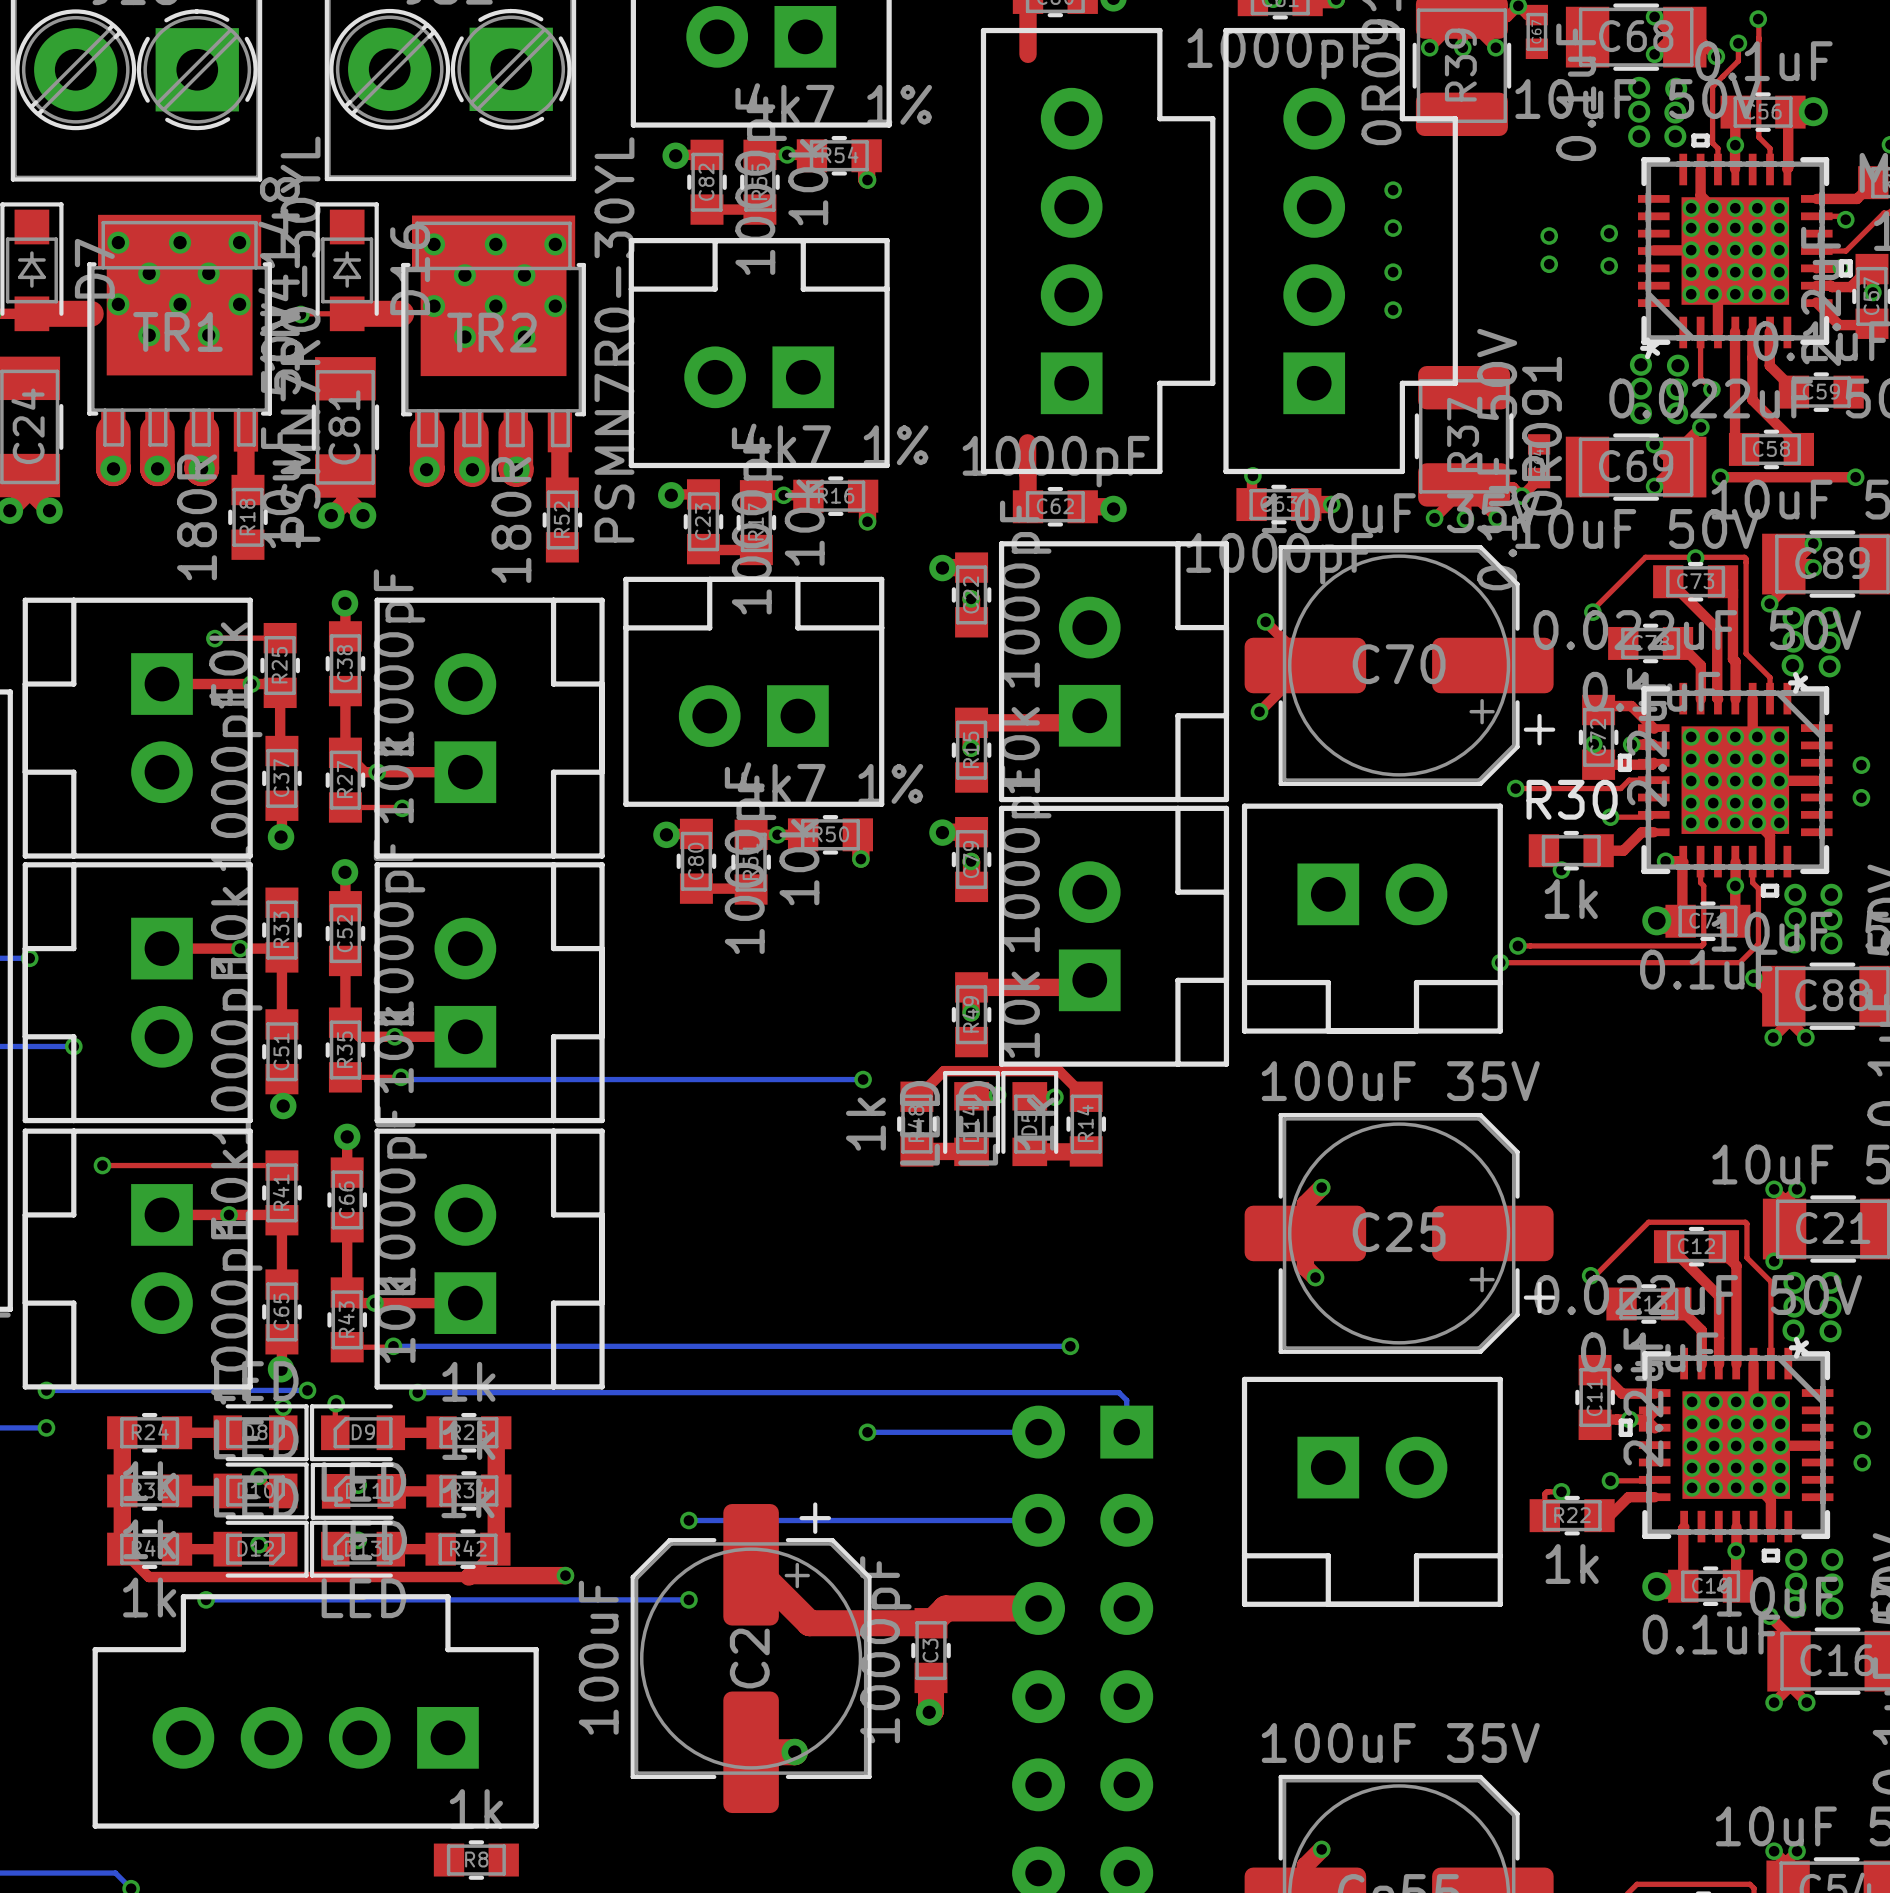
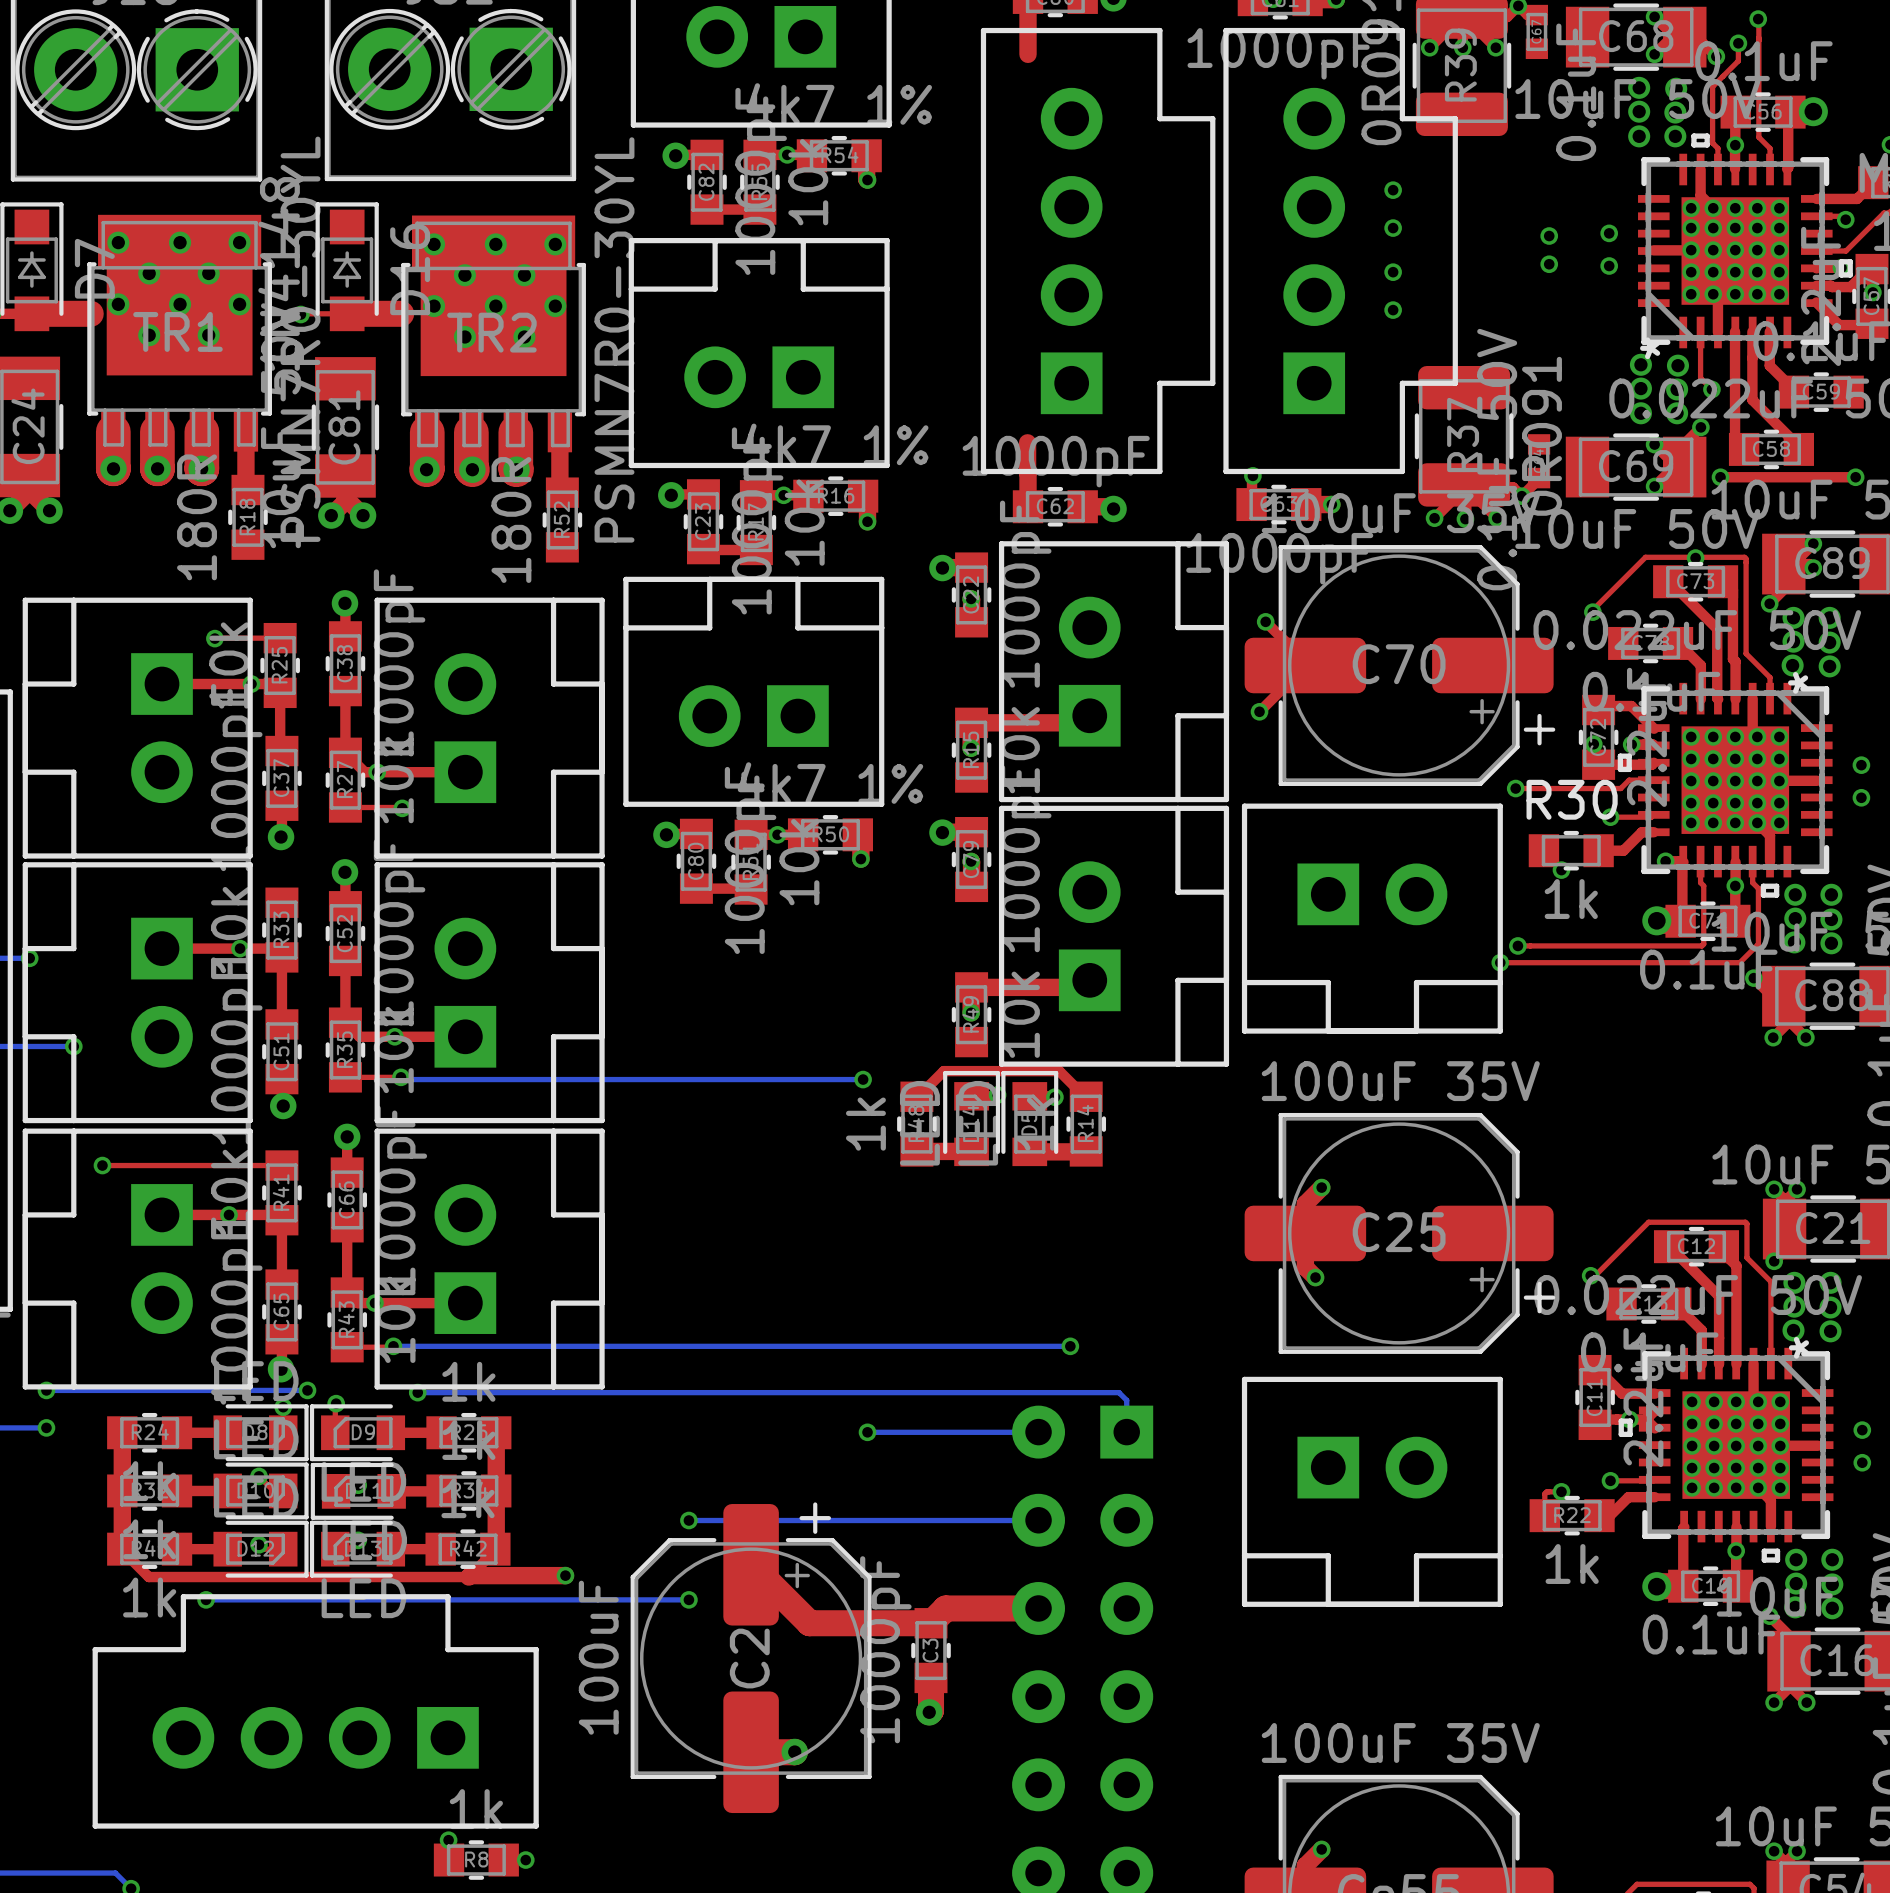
via: none -> (448, 1840)
via: none -> (525, 1860)

